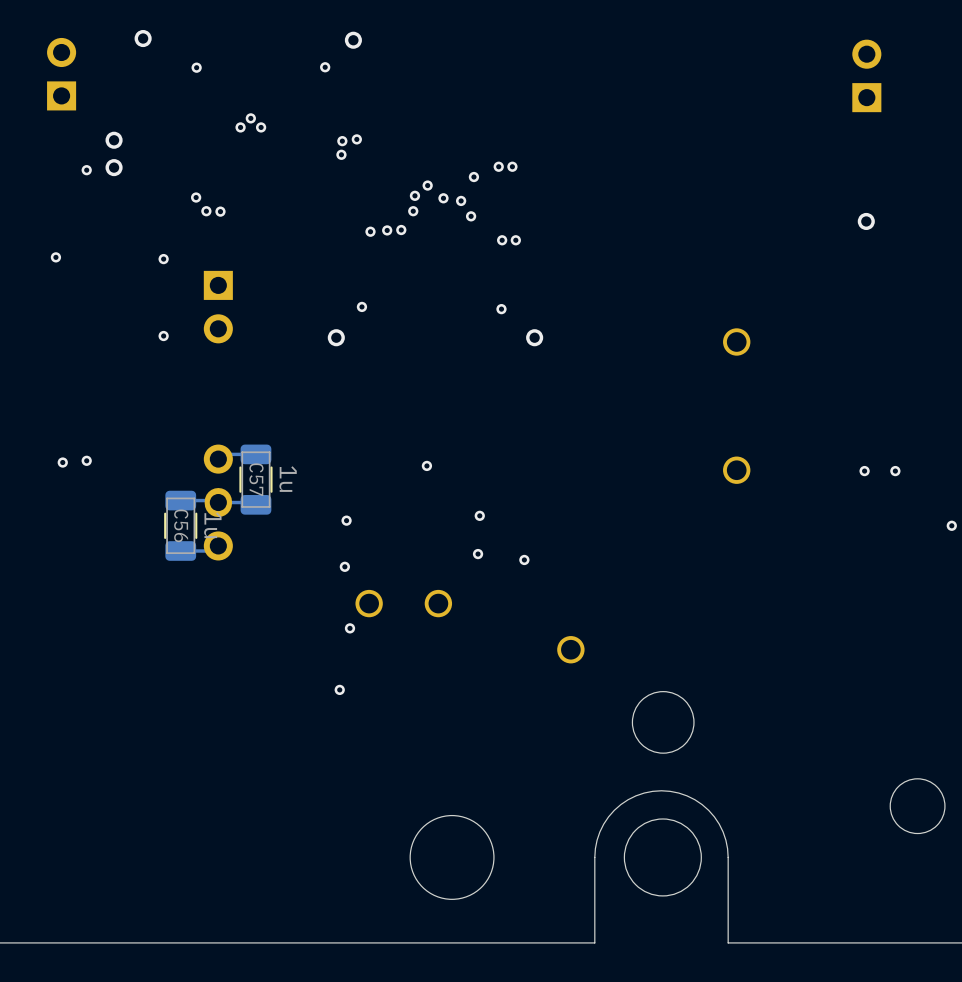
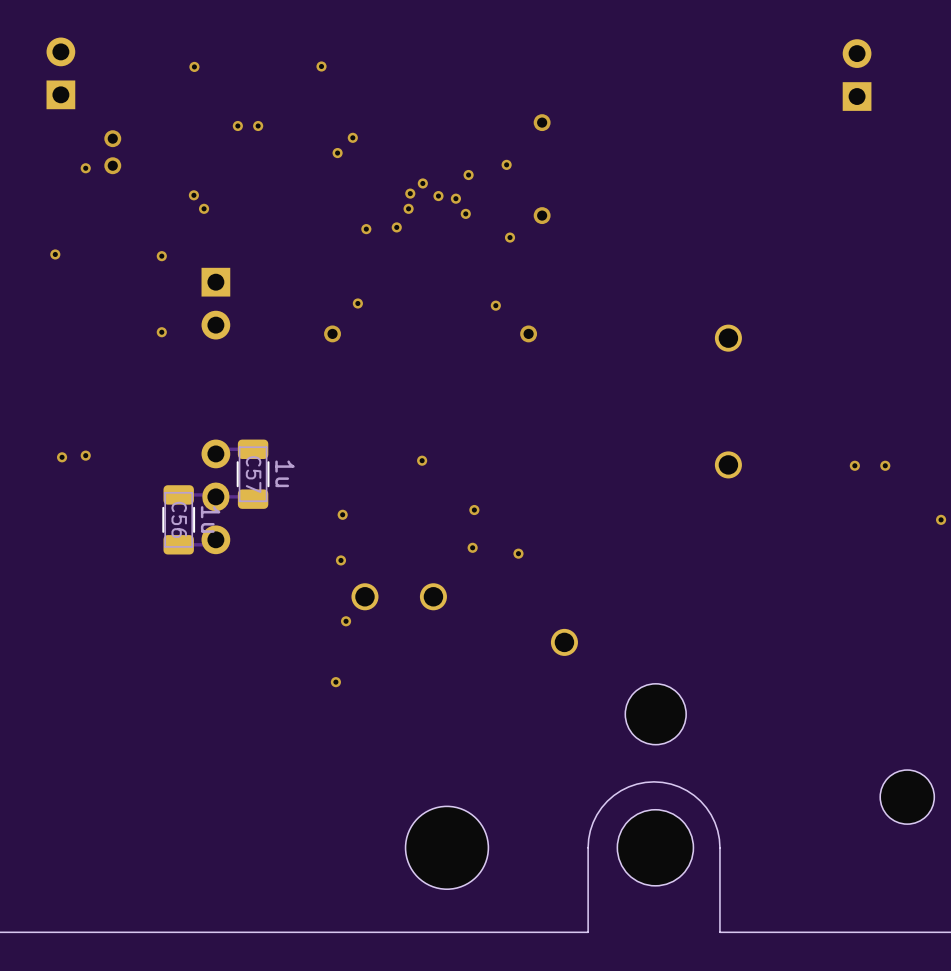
via: (143, 38) -> none
via: (353, 40) -> none
via: (250, 118) -> none
via: none -> (542, 122)
via: (342, 141) -> none
via: (498, 166) -> none
via: (220, 211) -> none
via: none -> (542, 215)
via: (866, 221) -> none
via: (387, 230) -> none
via: (502, 240) -> none

